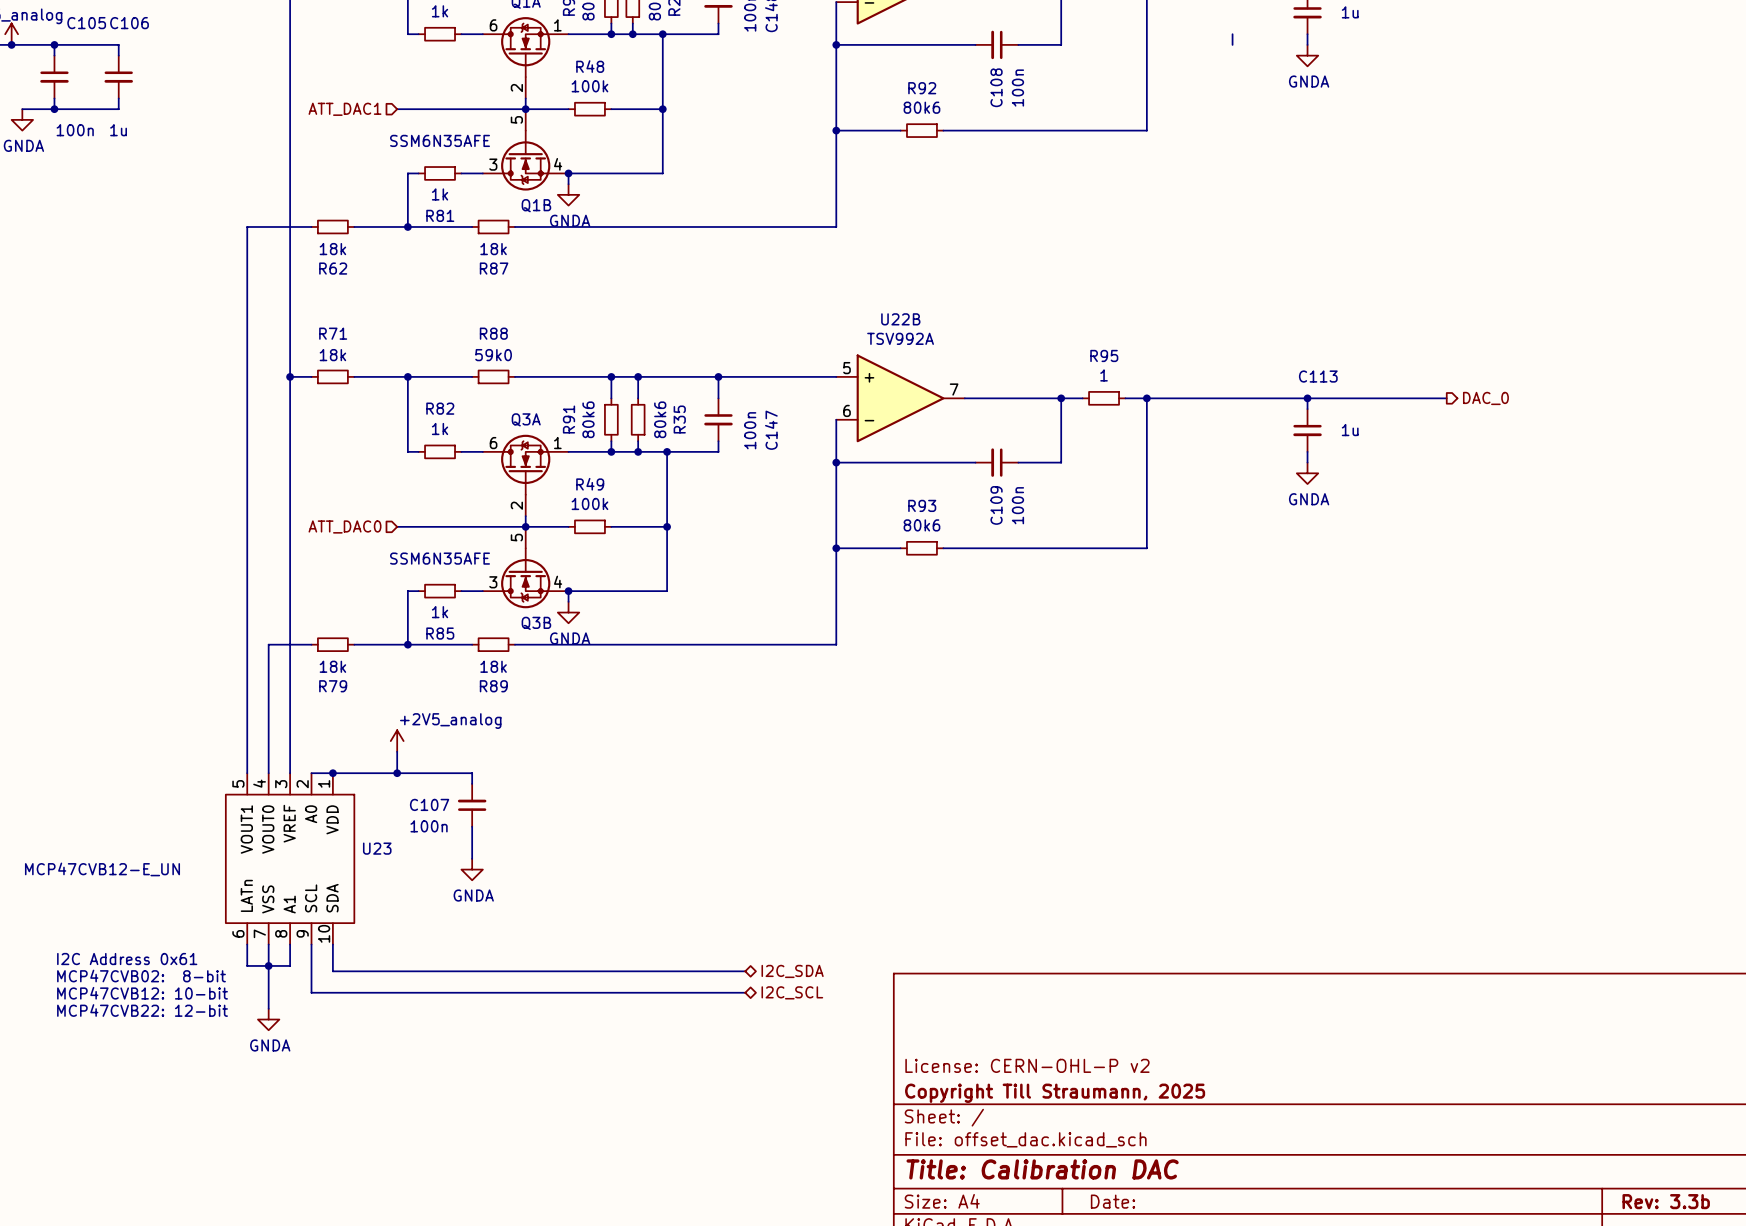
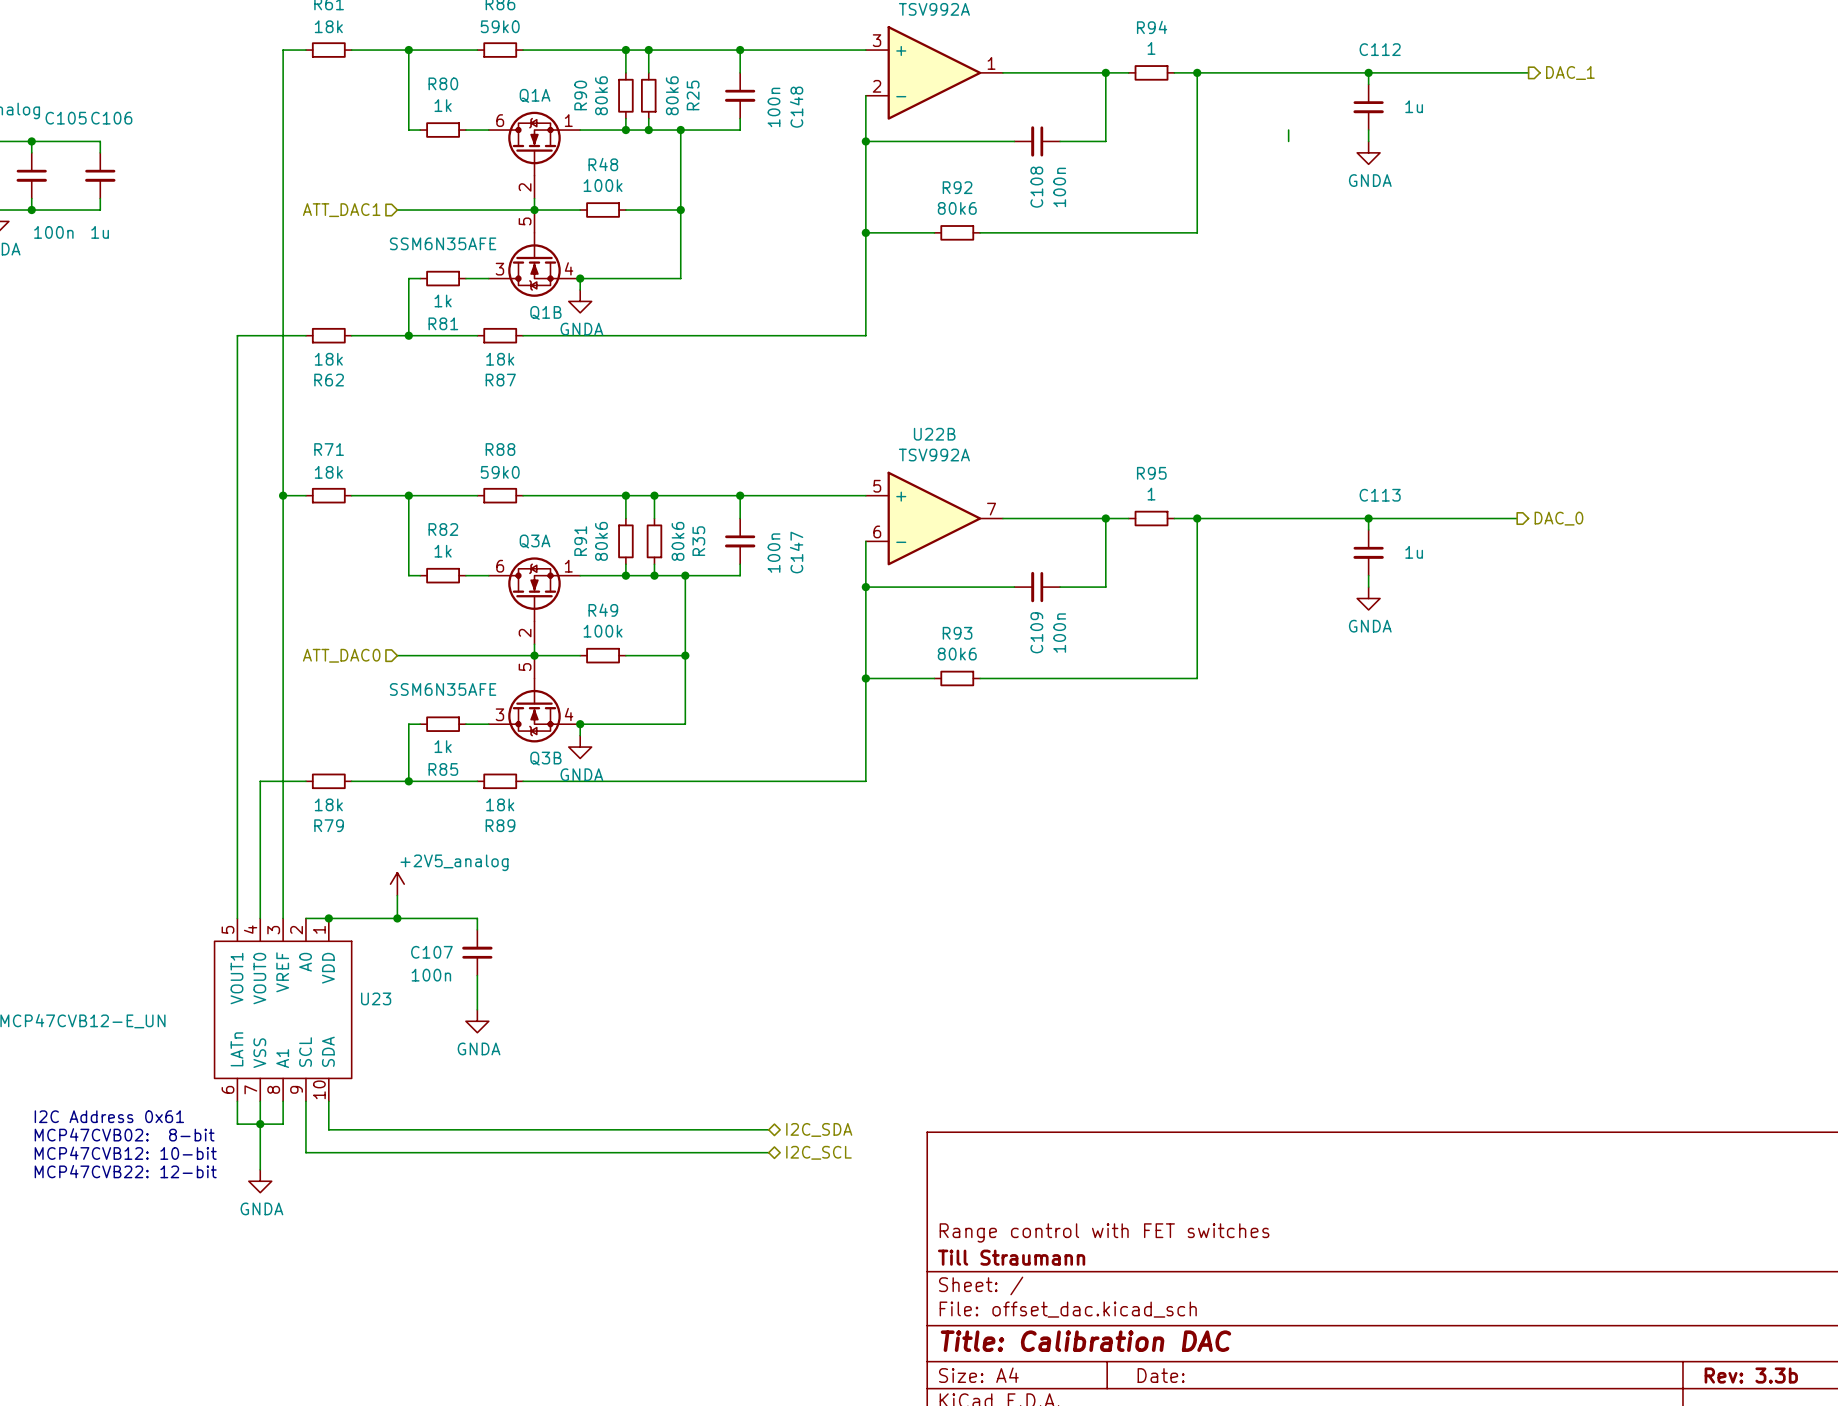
title block: License: CERN-OHL-P v2 (1027, 1065) -> Range control with FET switches (1104, 1232)
title block: Copyright Till Straumann, 2025 (1055, 1093) -> Till Straumann (1011, 1257)

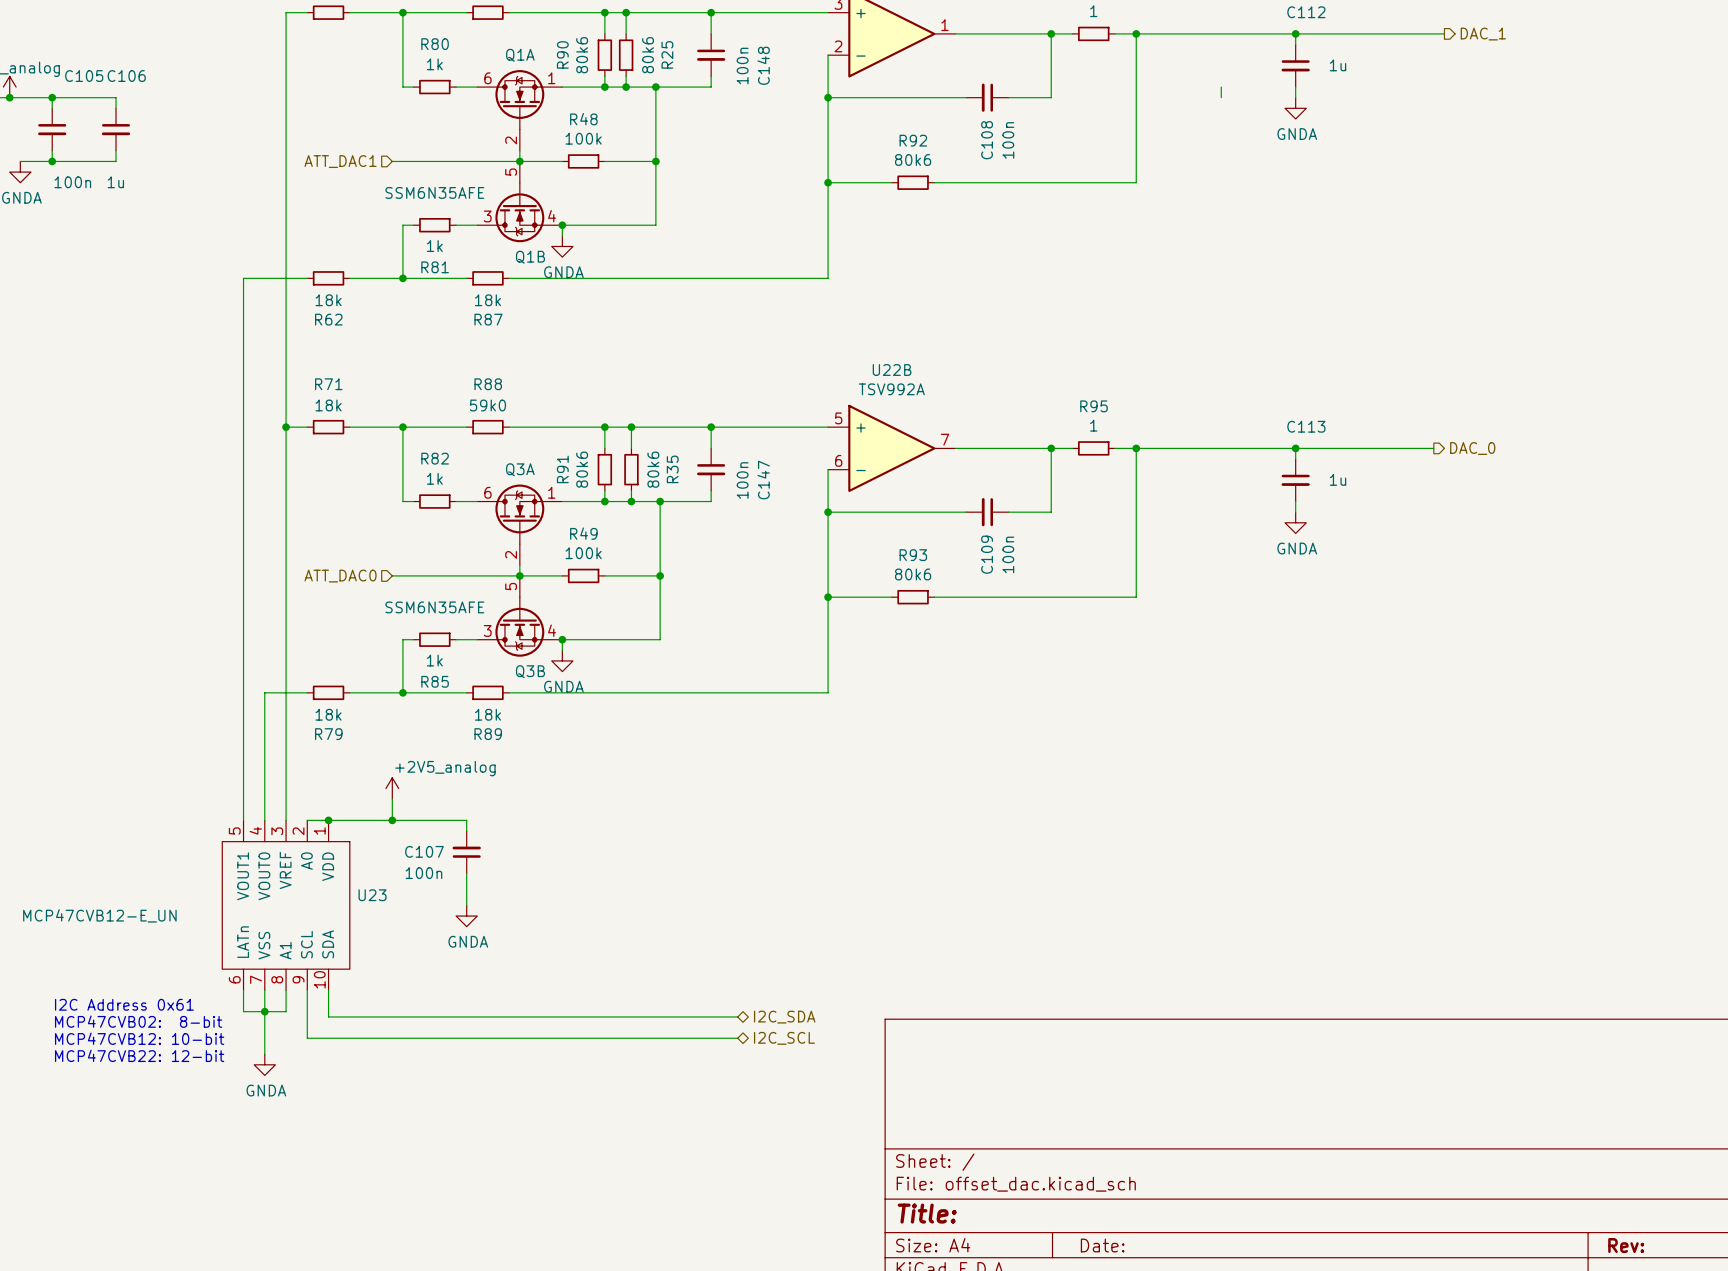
title block: Range control with FET switches (1104, 1232) -> none
title block: Till Straumann (1011, 1257) -> none
title block: Title: Calibration DAC (1085, 1341) -> Title: (927, 1213)
title block: Rev: 3.3b (1751, 1375) -> Rev: (1626, 1245)

